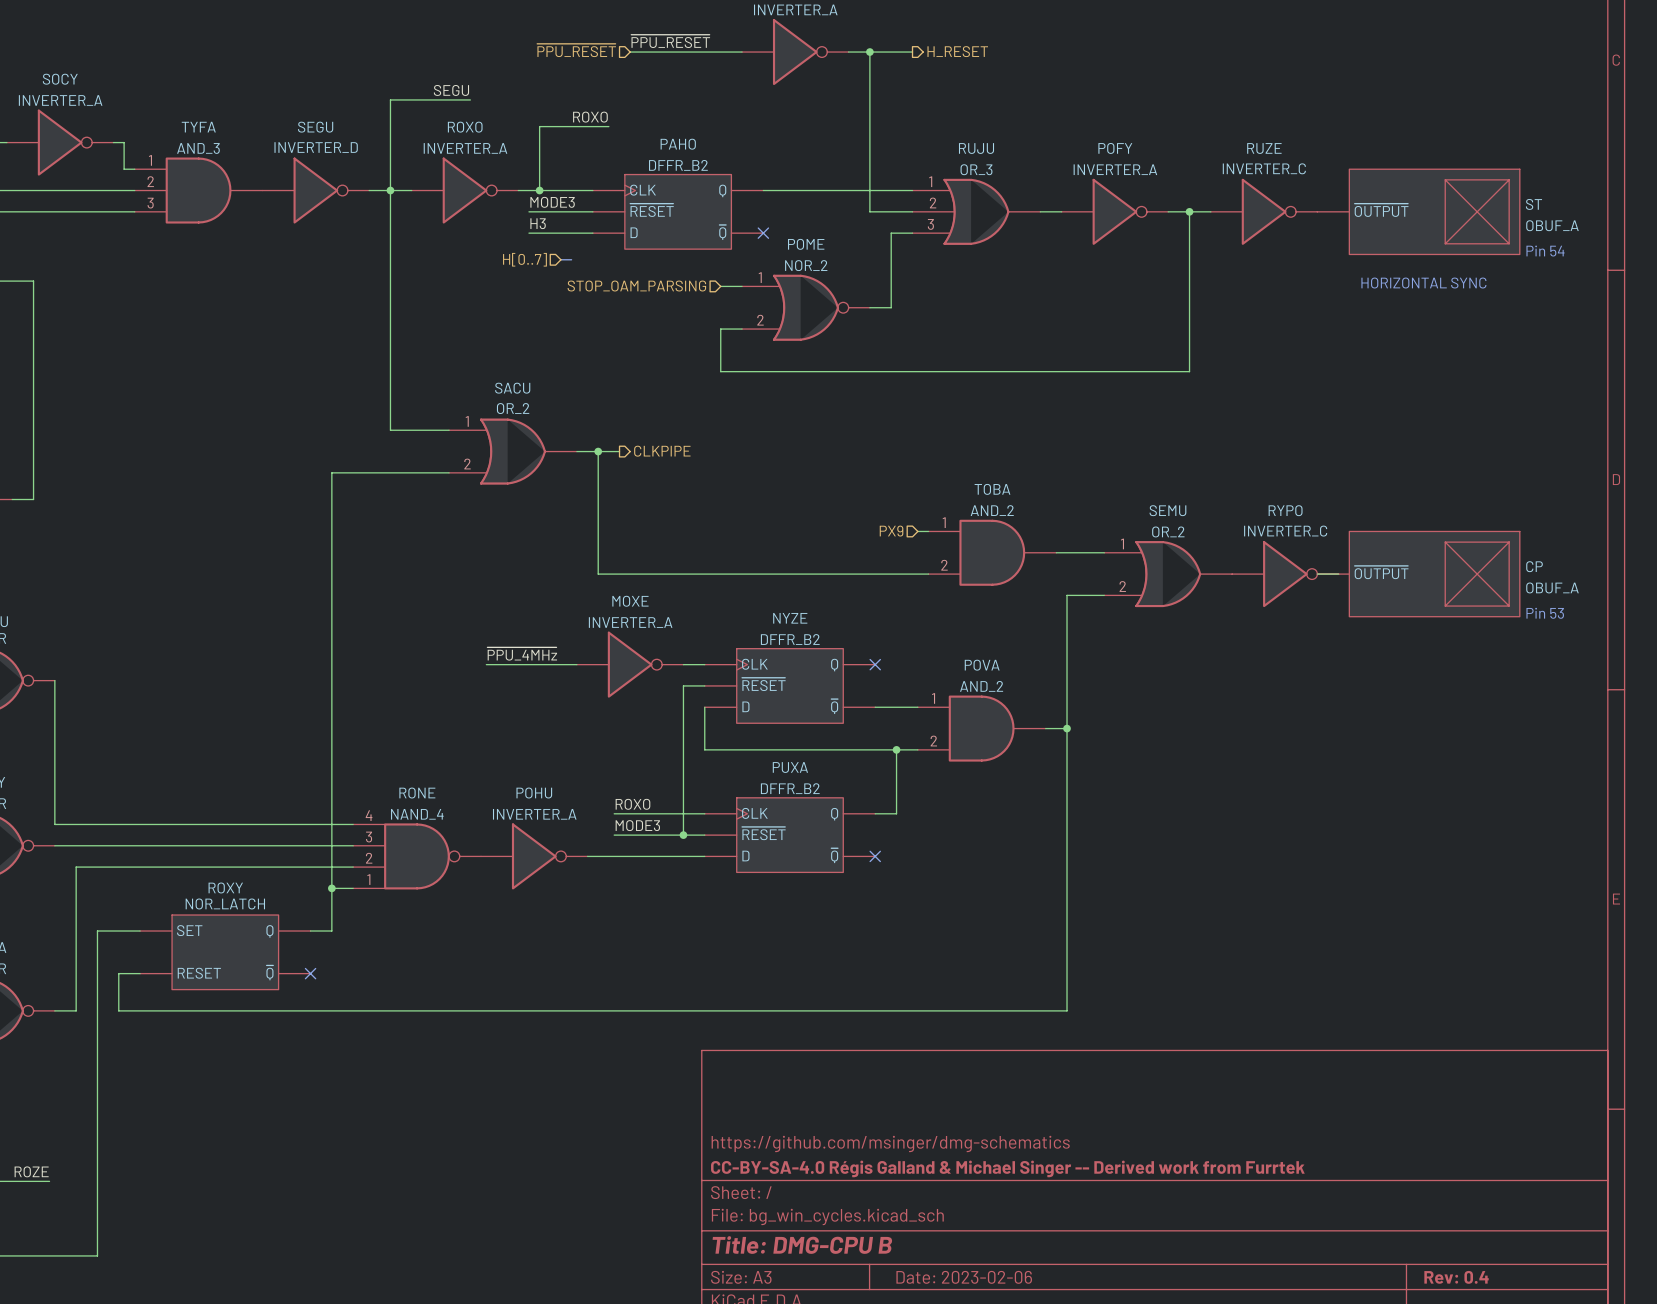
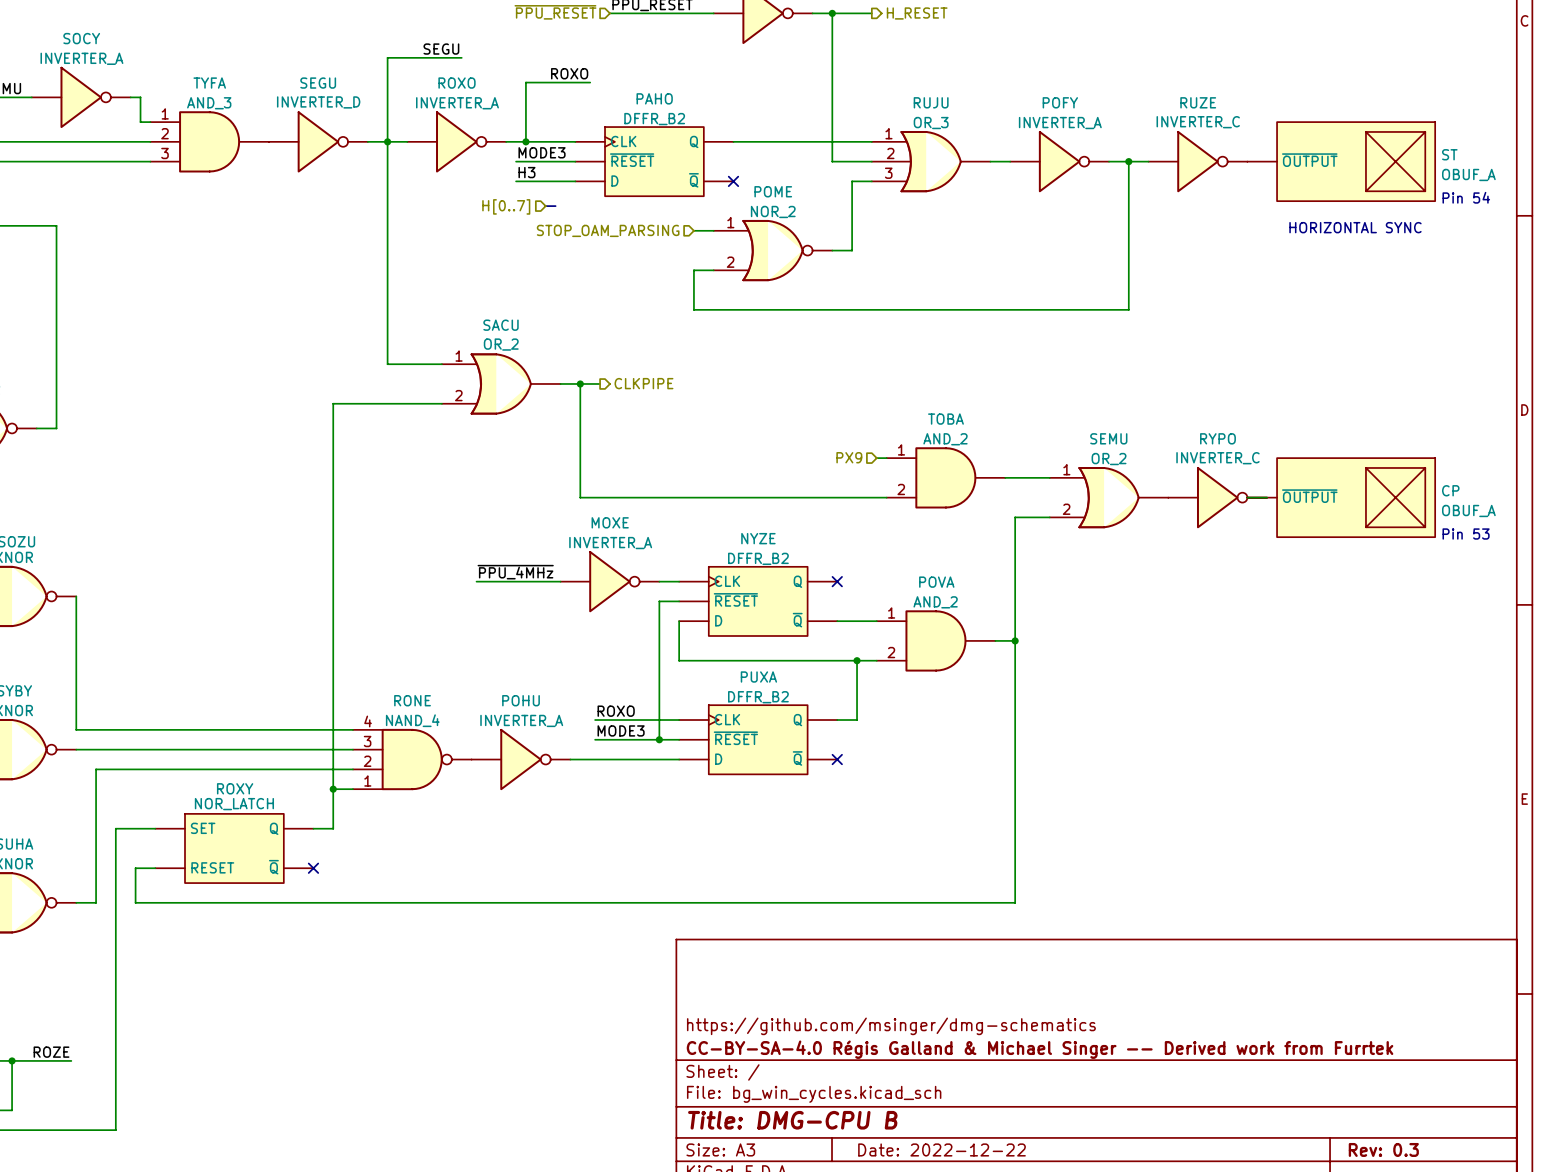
title block: Date: 2023-02-06 (964, 1277) -> Date: 2022-12-22 (942, 1149)
title block: Rev: 0.4 (1456, 1277) -> Rev: 0.3 (1383, 1149)

